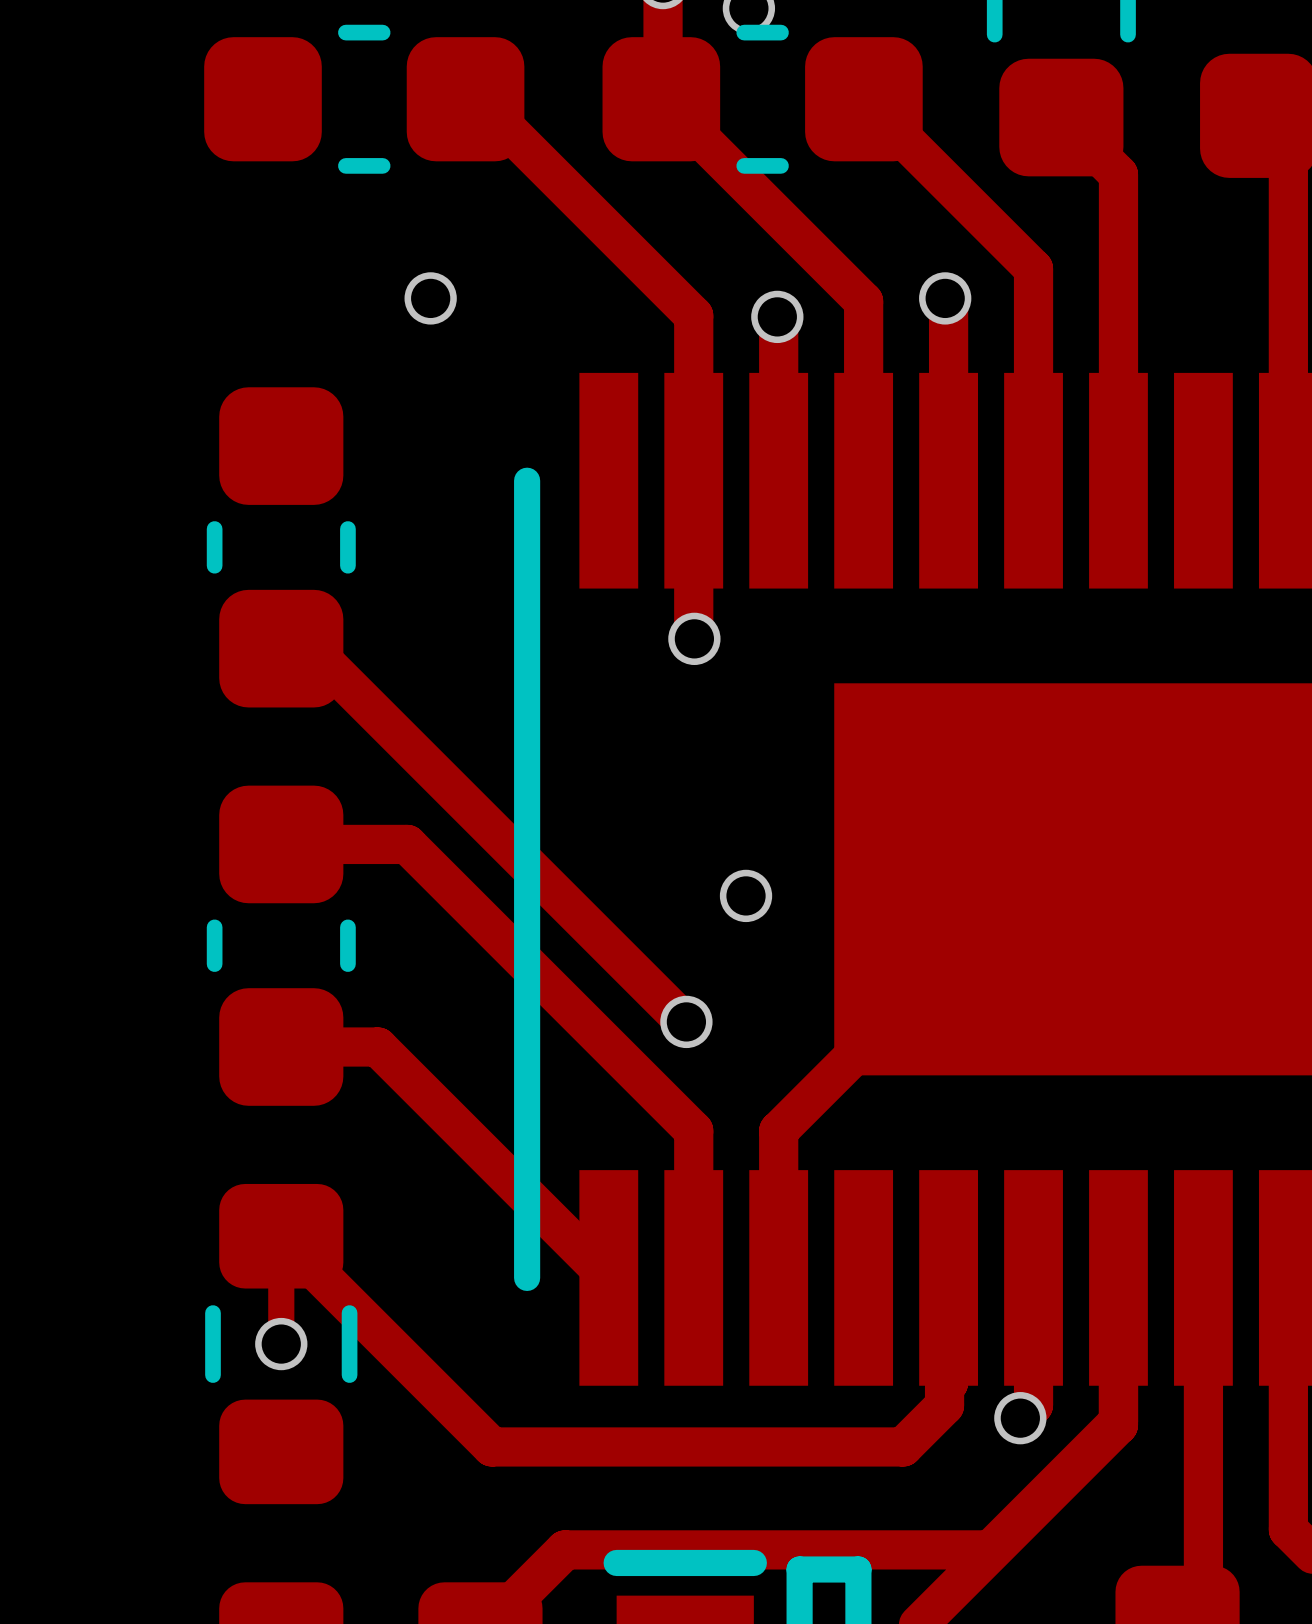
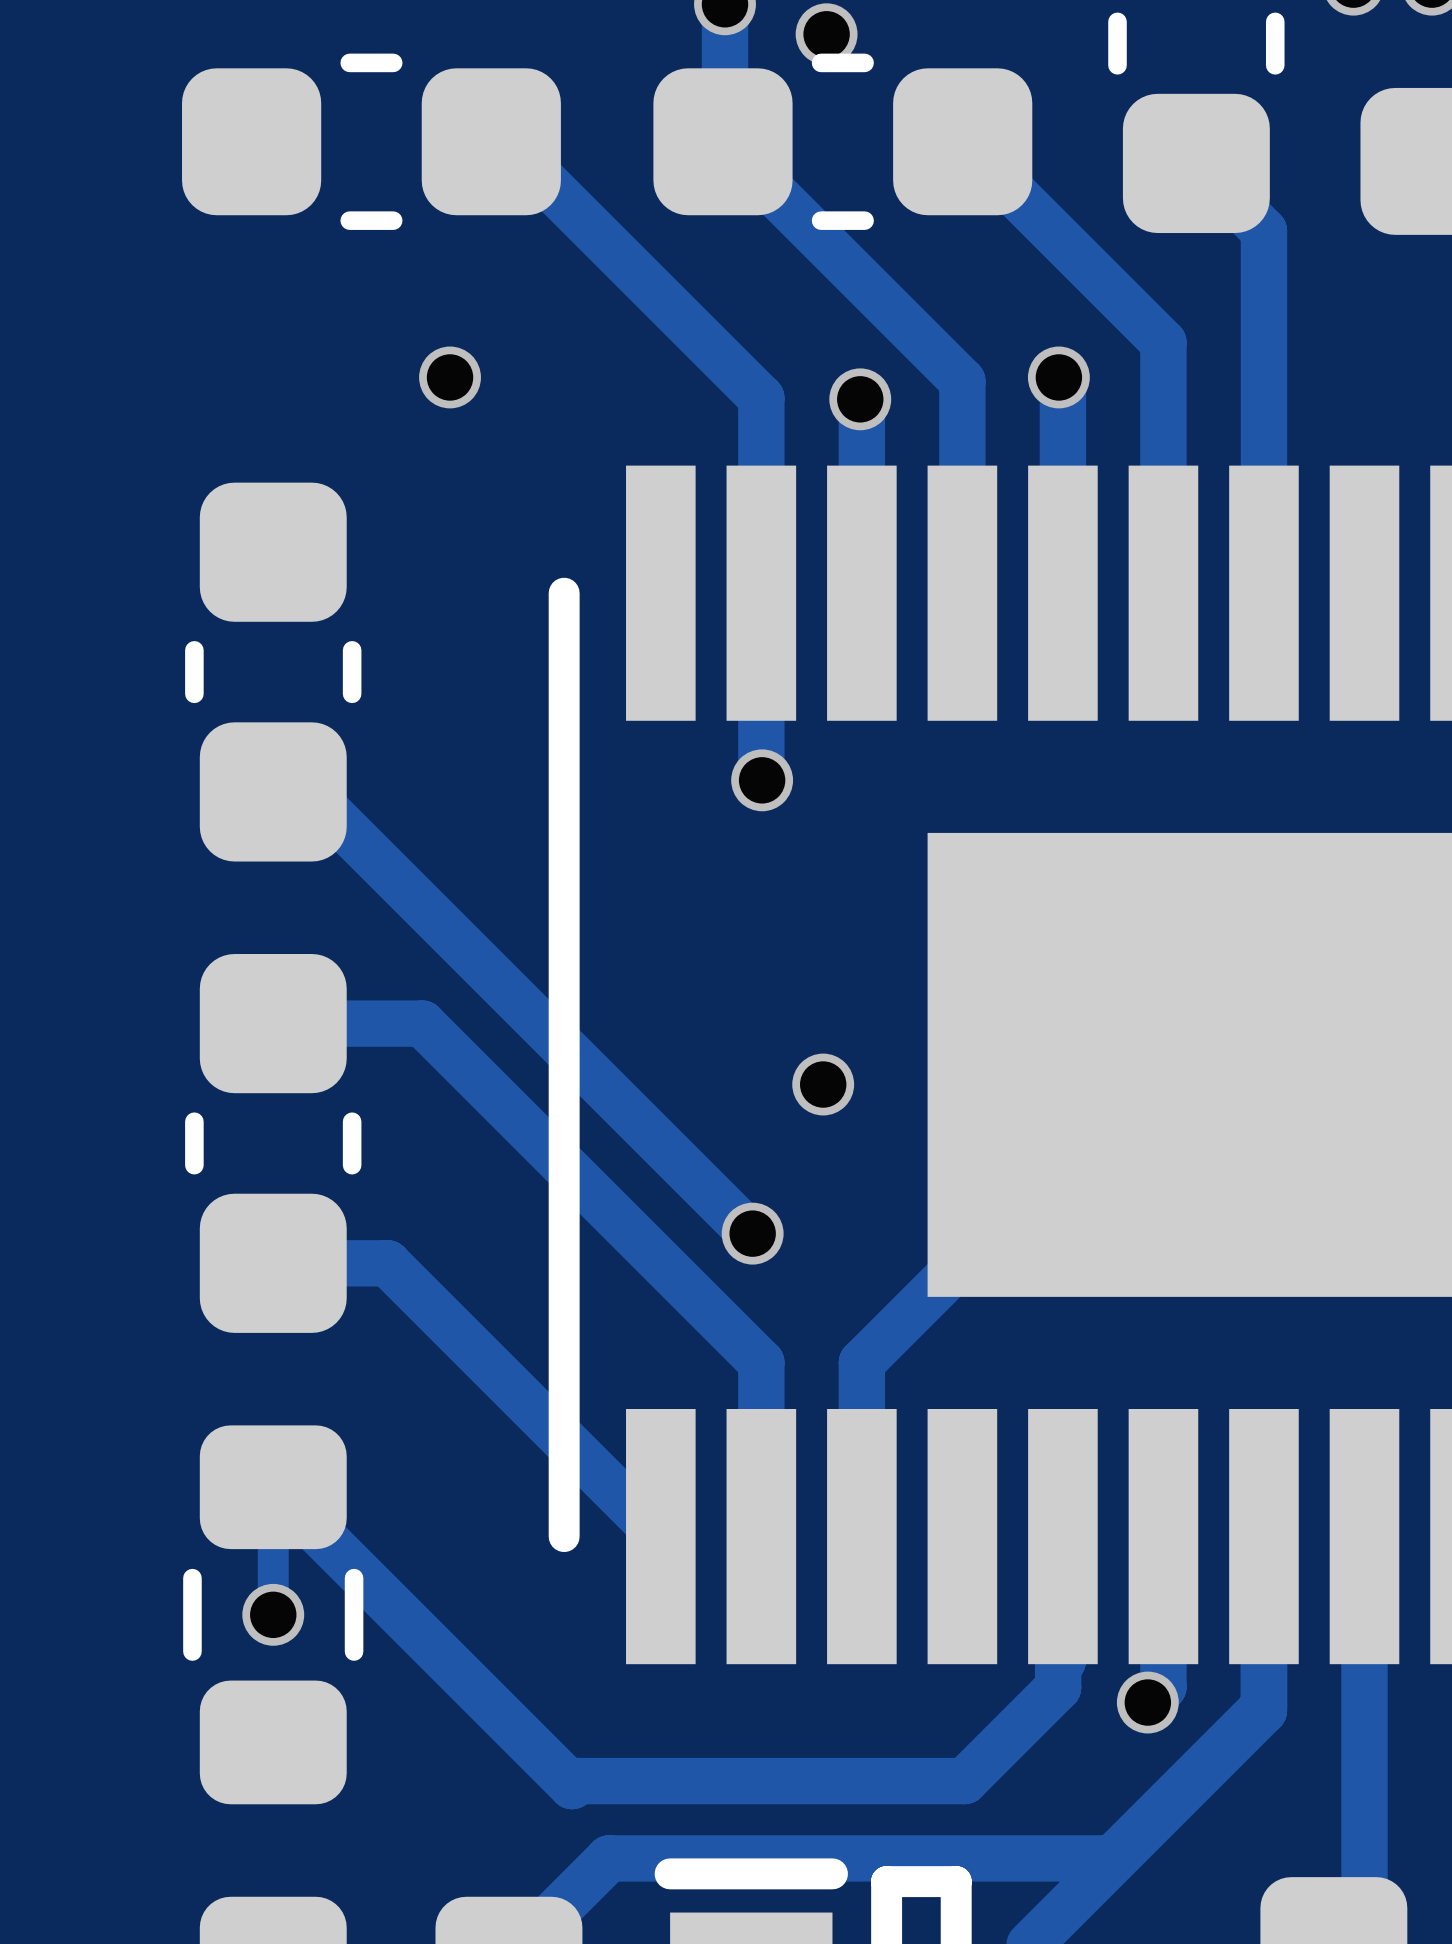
track: (492, 1446) (903, 1446) -> (522, 1736) (572, 1786) (577, 1781) (964, 1781) (1009, 1736)

